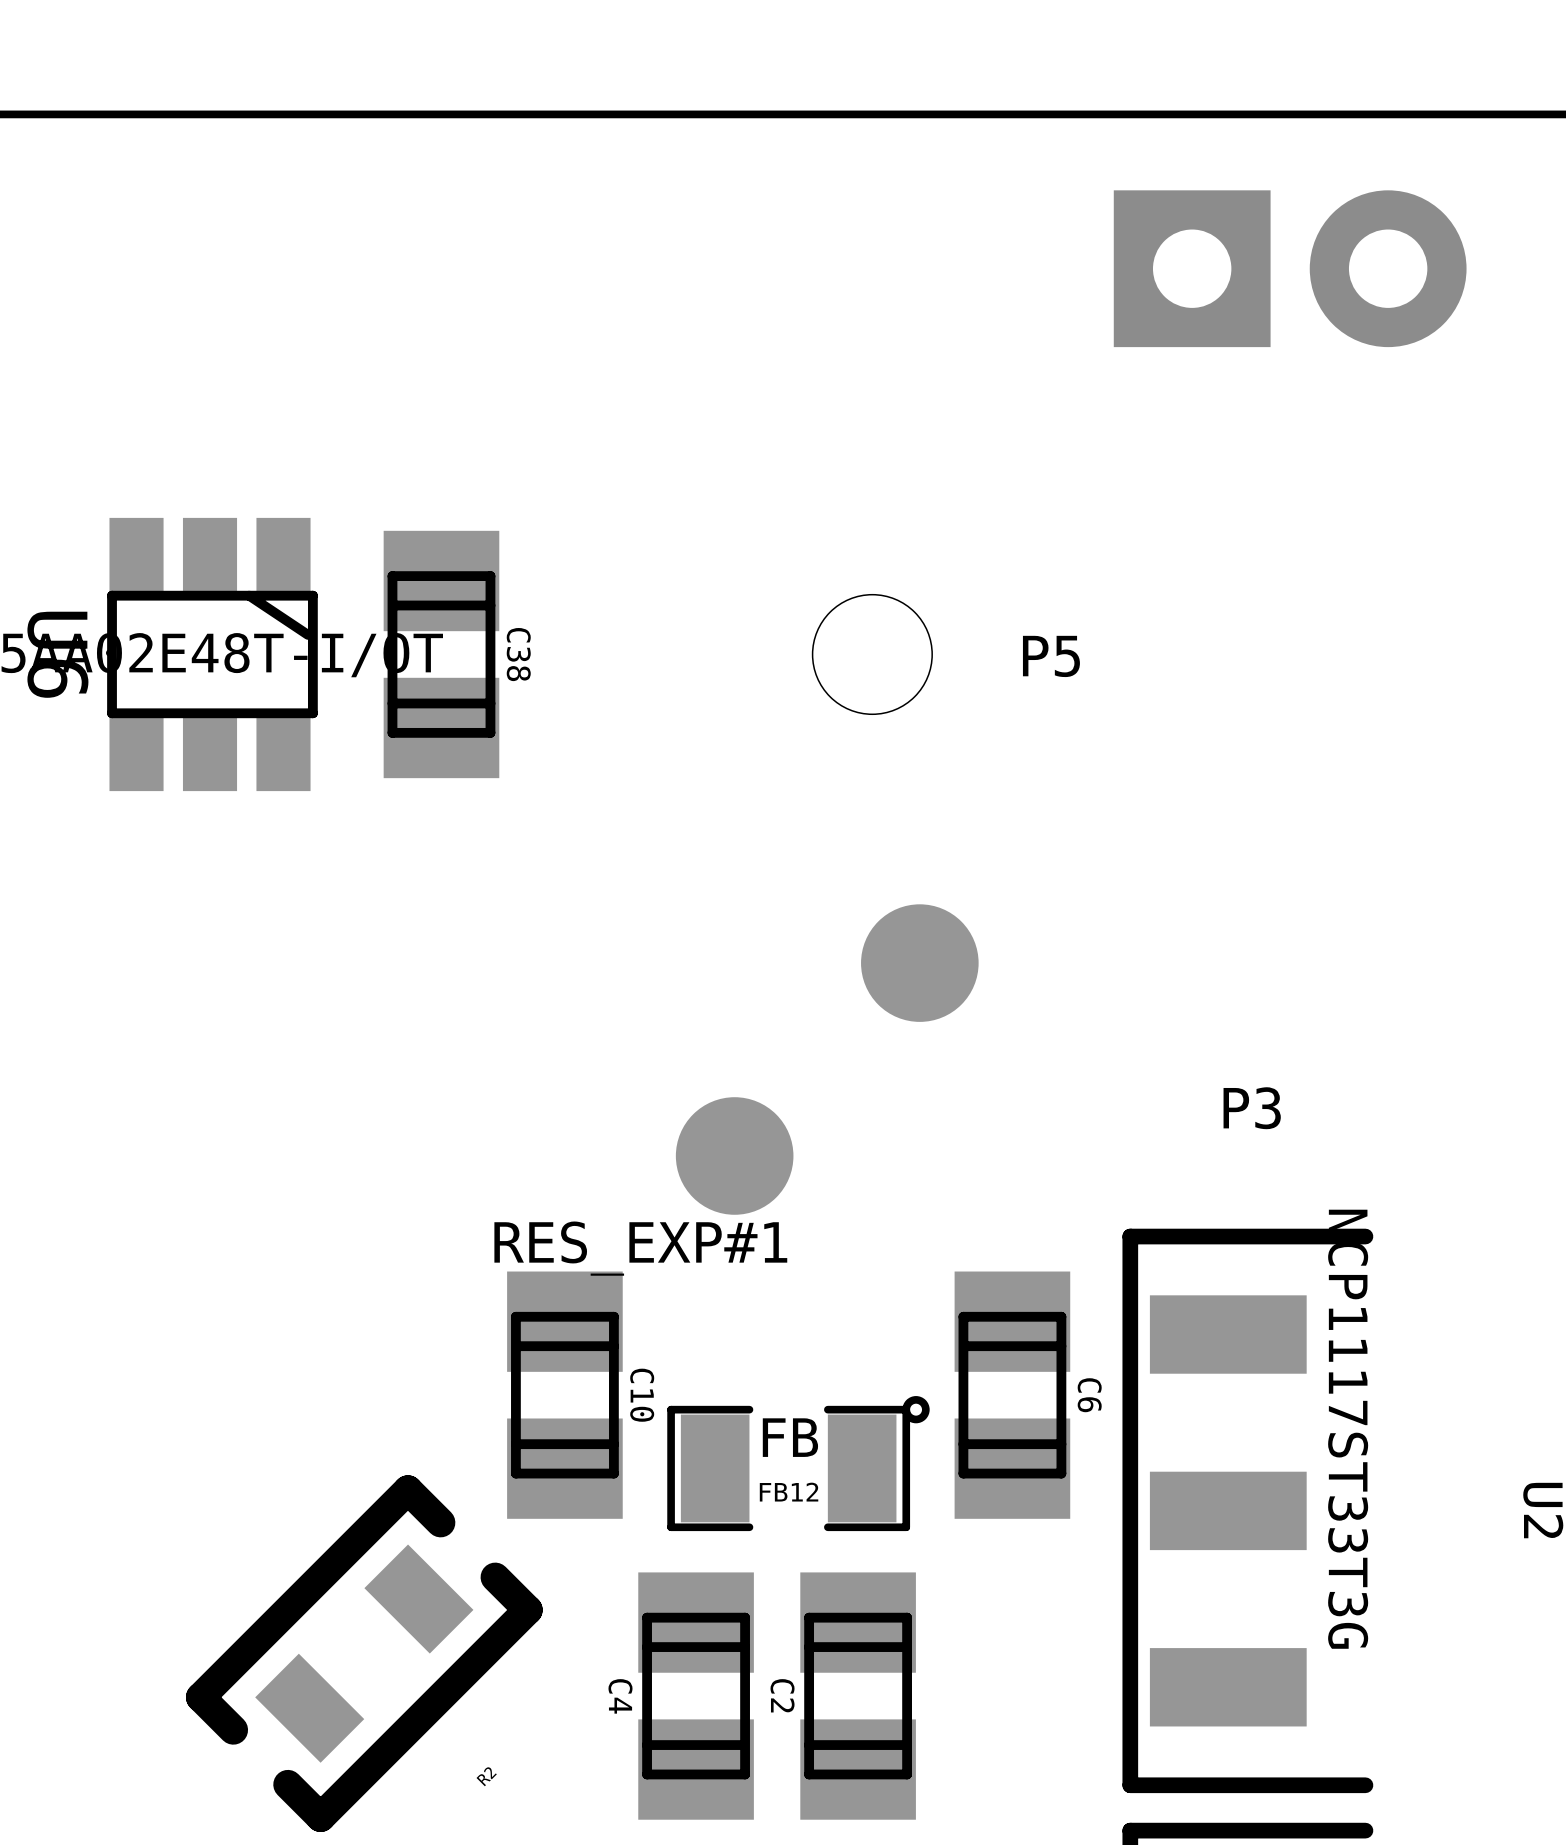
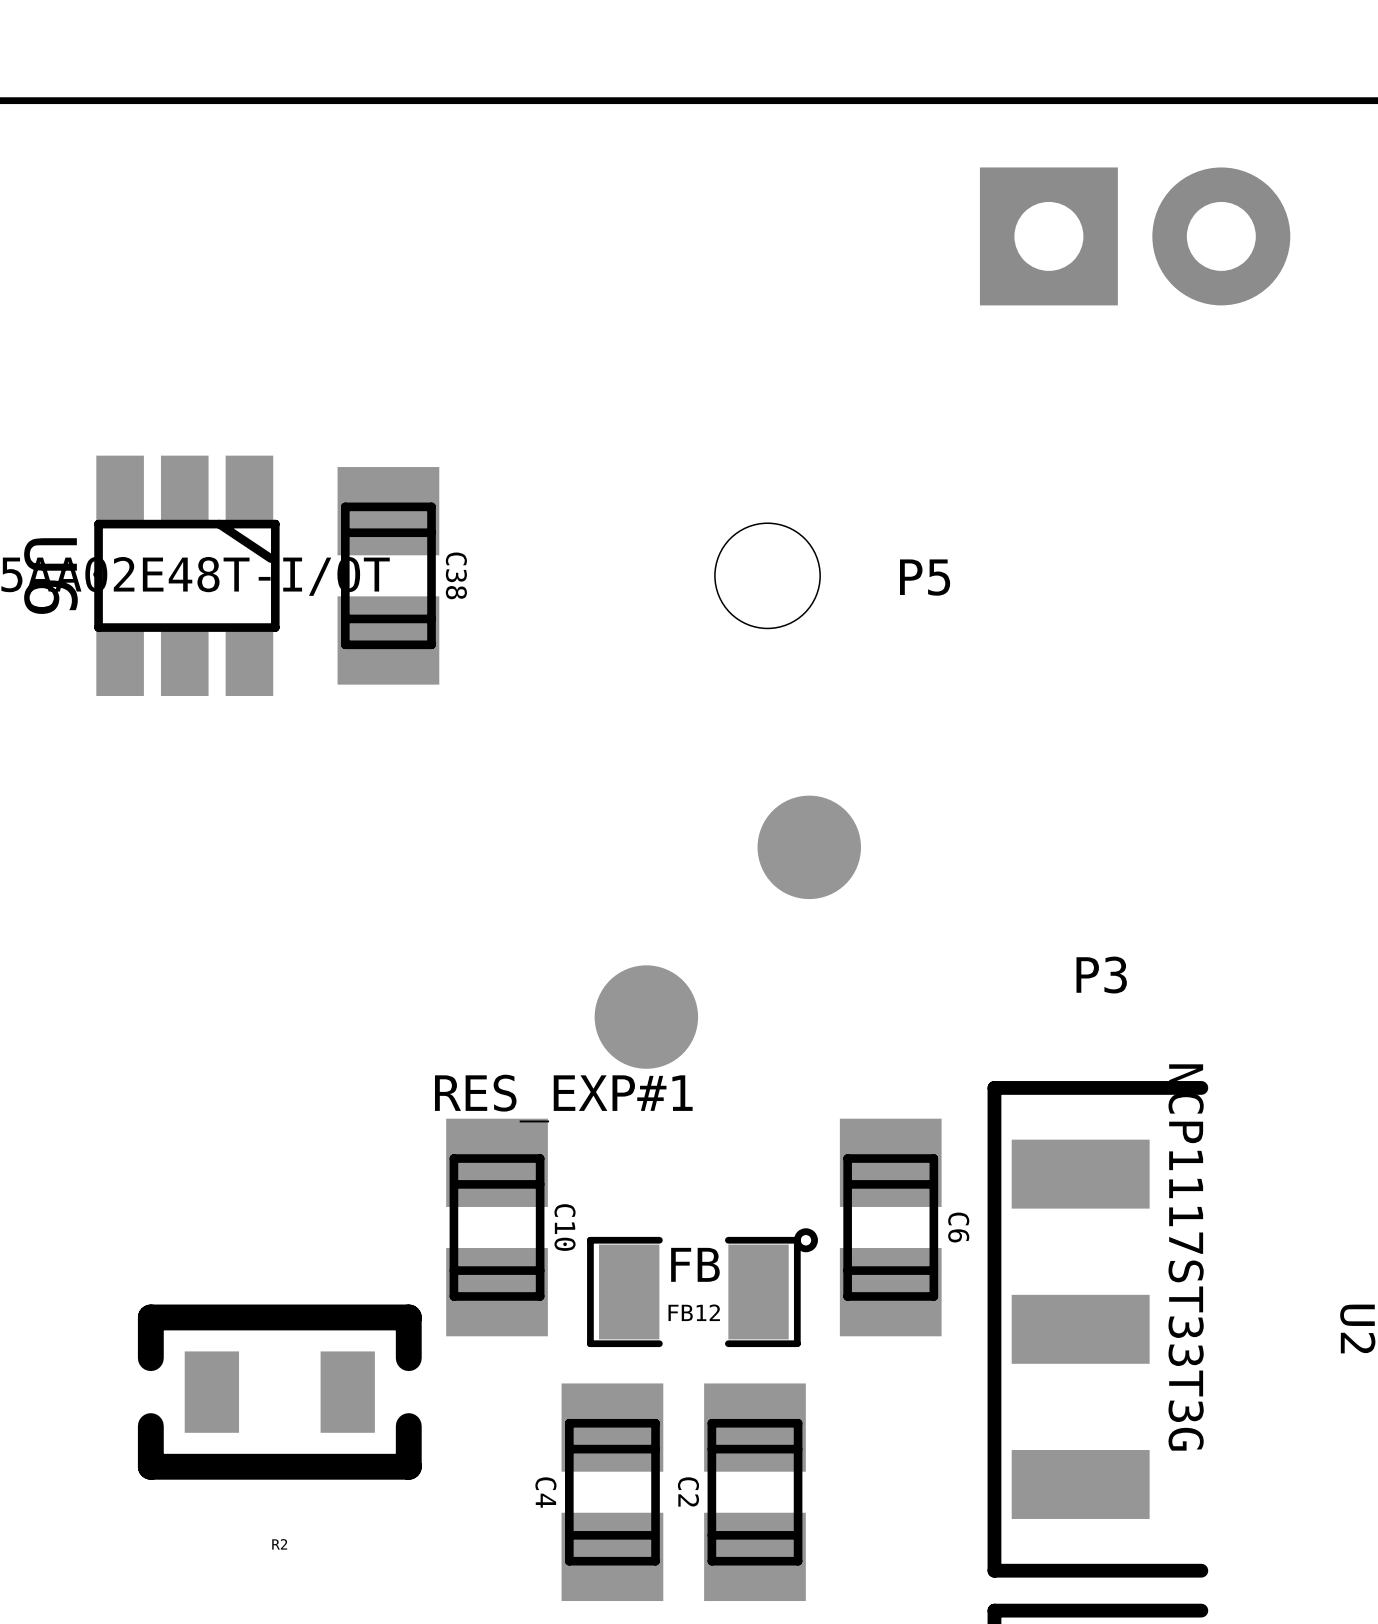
R2 rotation: 0° (364, 1653) -> 45° clockwise (279, 1392)

